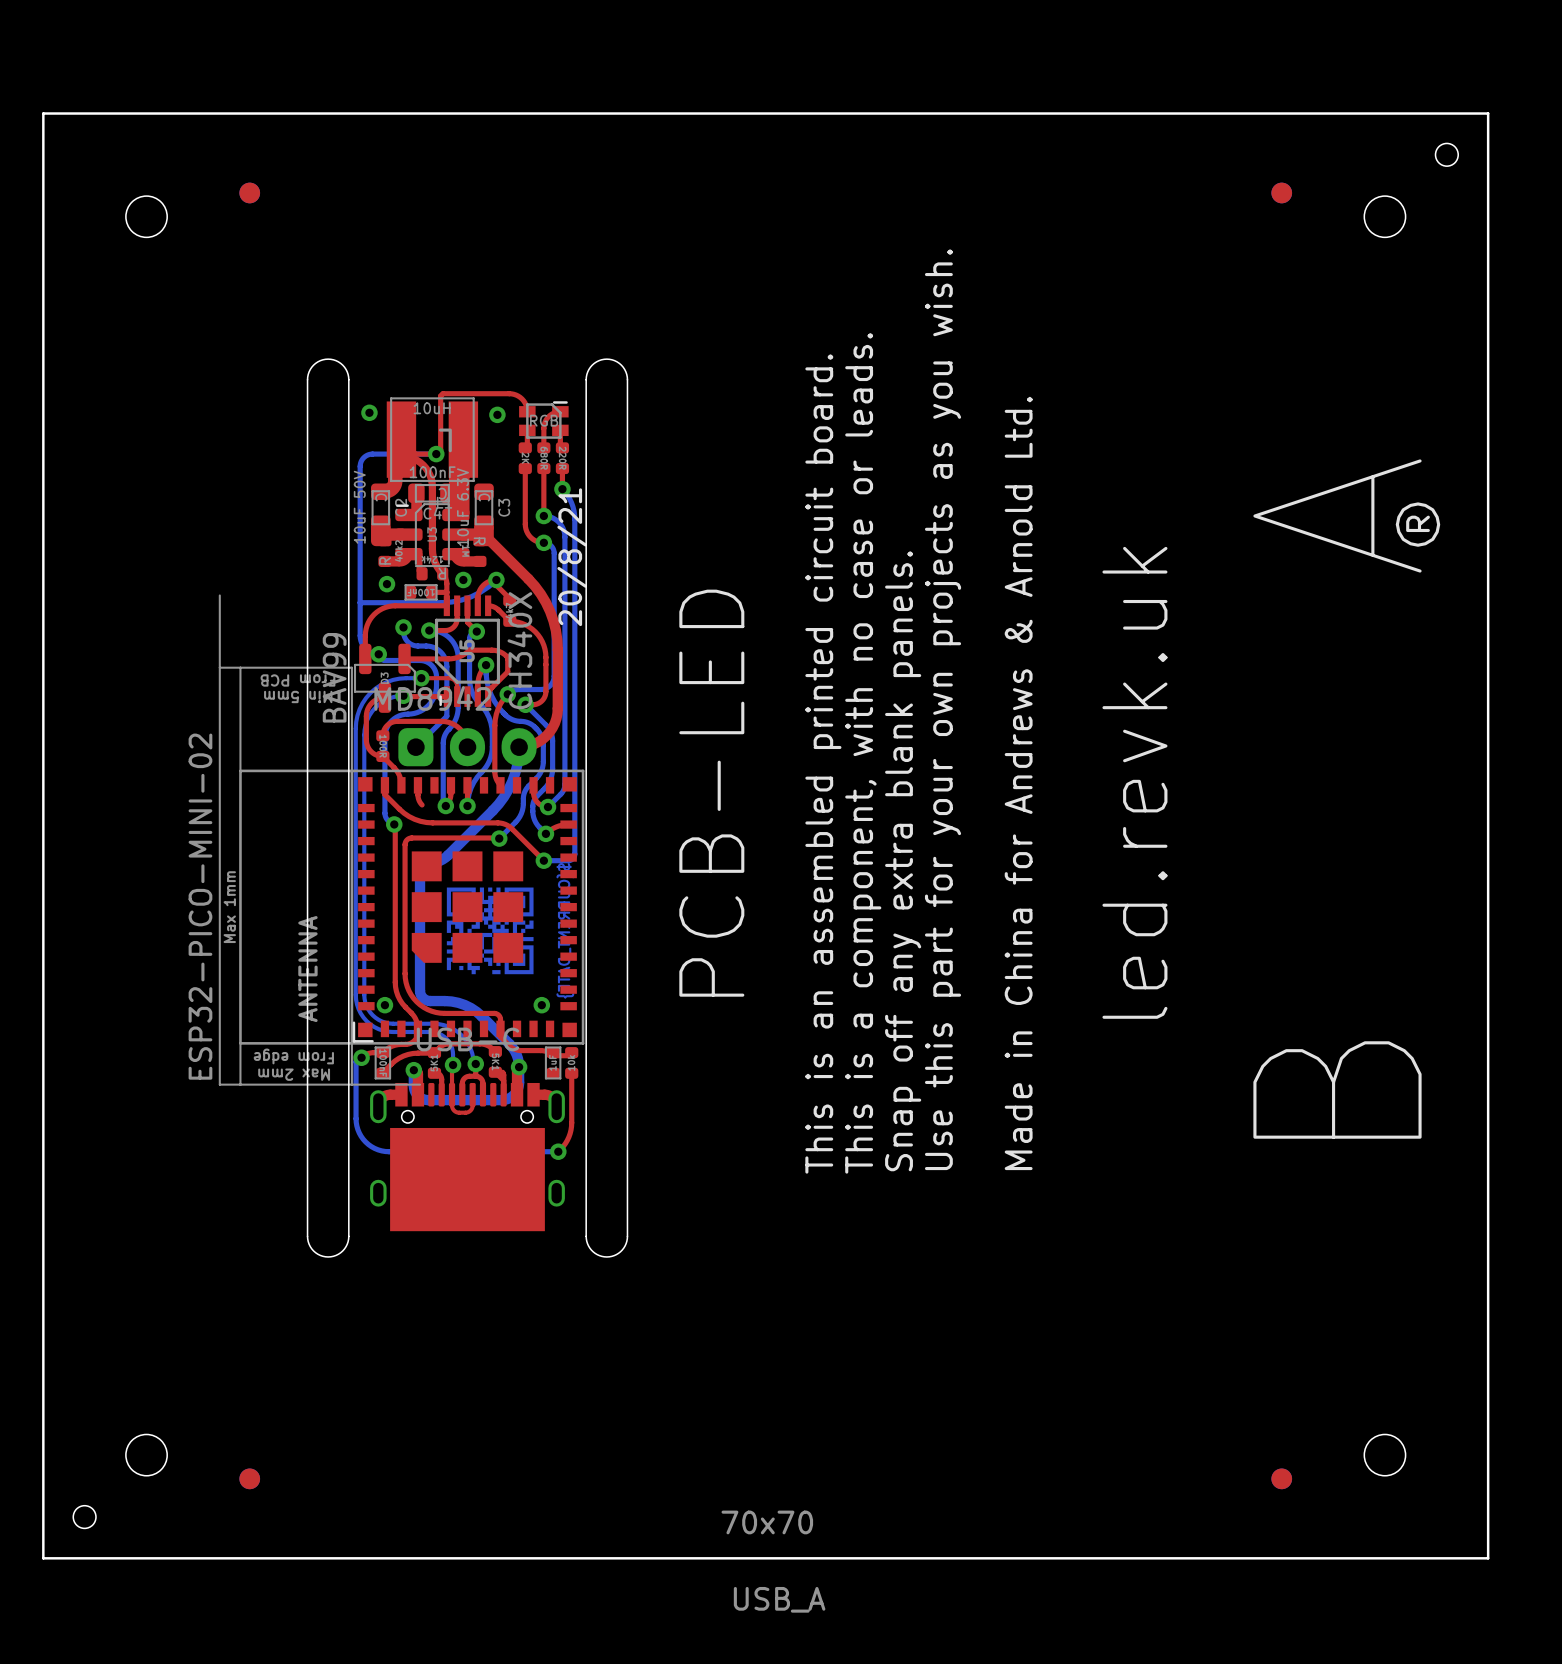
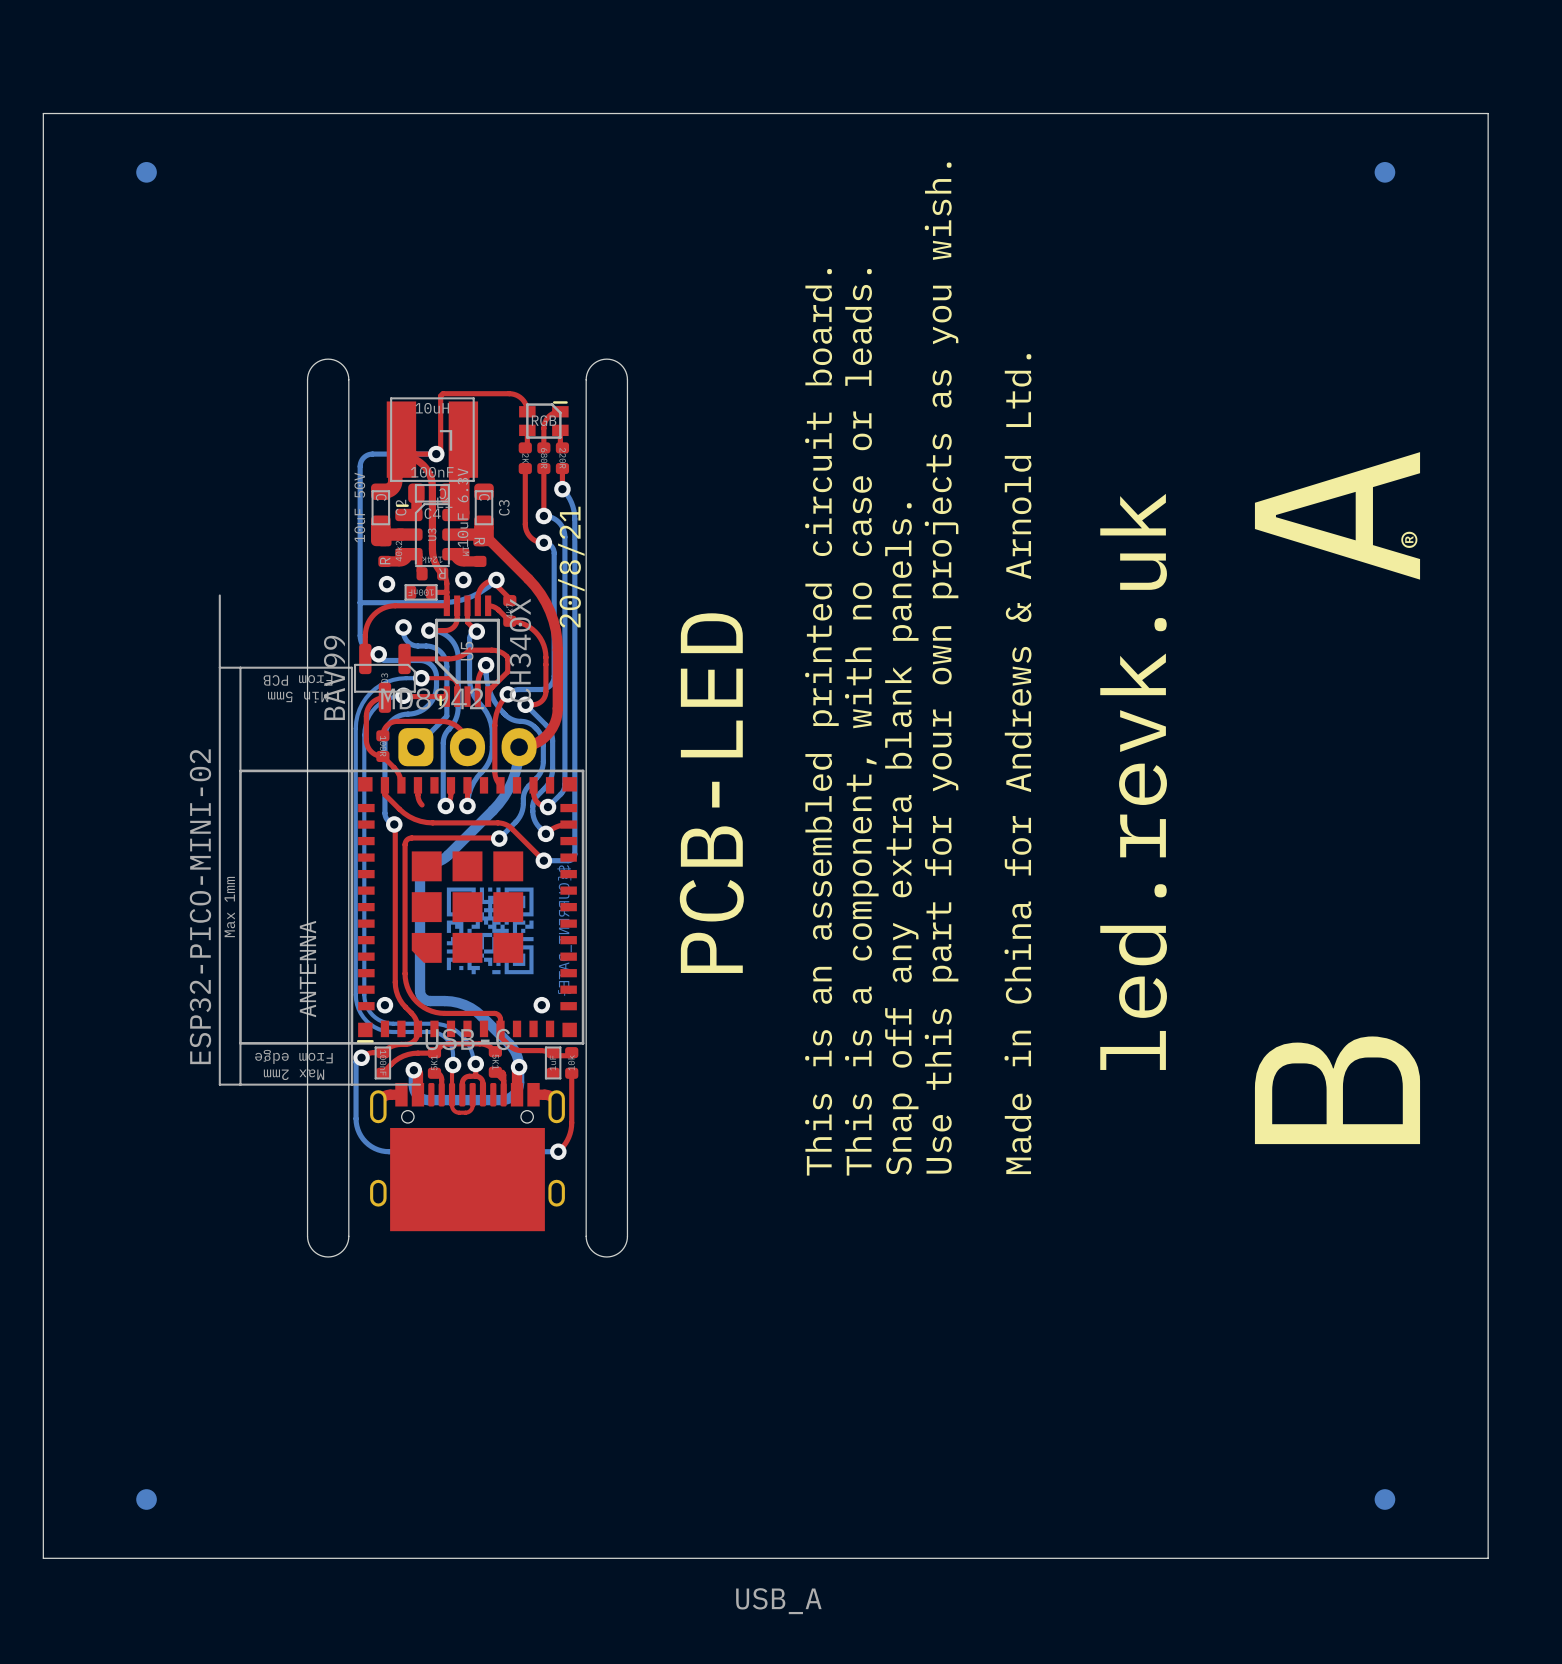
board edge: none -> (43, 113) (1488, 113) (1488, 1558) (43, 1558) (43, 113)
part: none -> (146, 172)
part: none -> (1384, 172)
via: (369, 412) -> none
via: (497, 414) -> none
part footprint: [218, 594, 585, 1086] -> [218, 594, 585, 1086]
part: 70x70 (765, 835) -> none
part: none -> (146, 1499)
part: none -> (1384, 1499)

